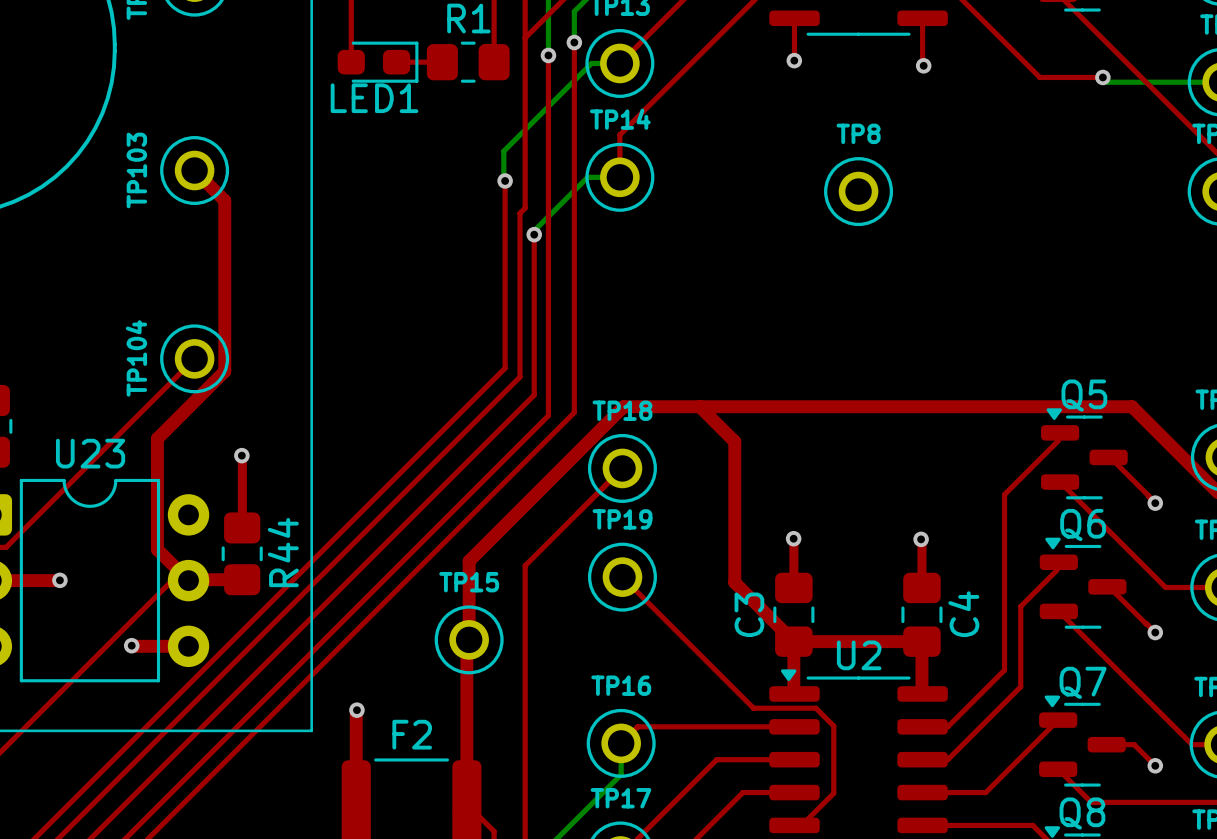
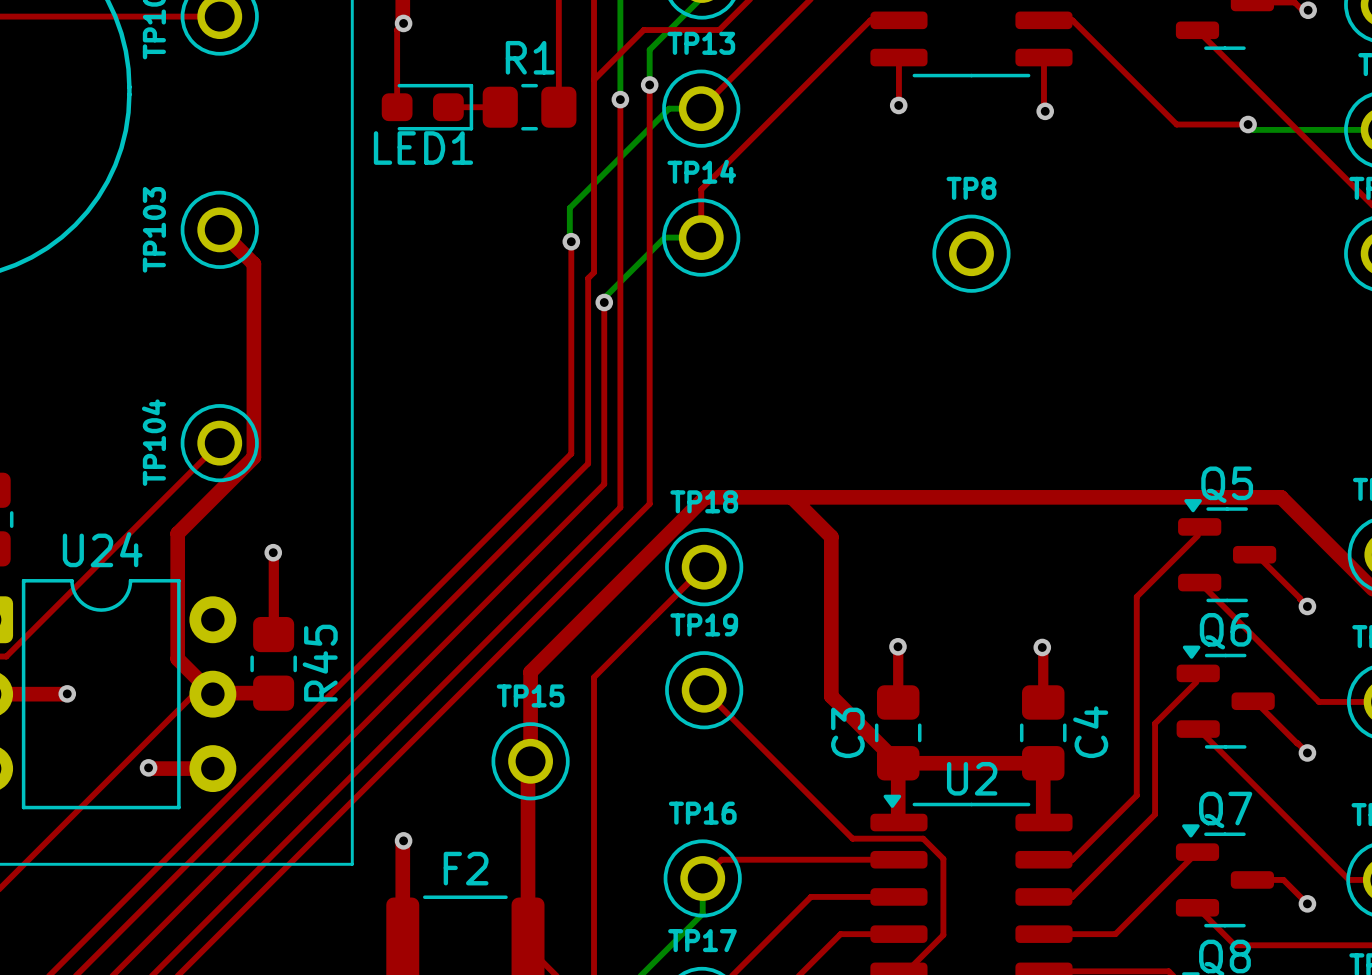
U23 name: U23 (90, 453) -> U24 (102, 549)
R44 name: R44 (283, 552) -> R45 (320, 663)

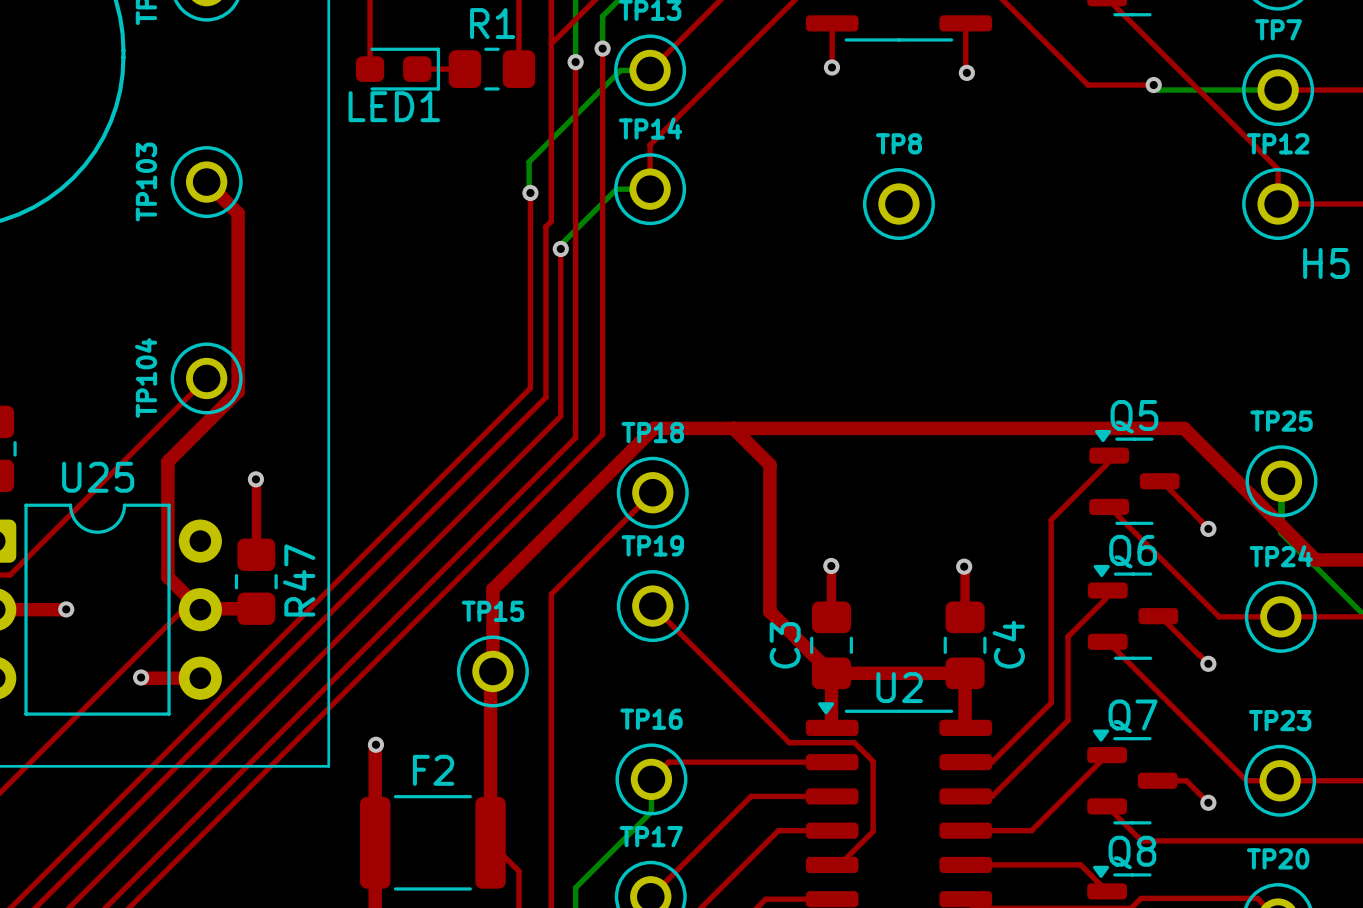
U24 name: U24 (102, 549) -> U25 (98, 477)
R45 name: R45 (320, 663) -> R47 (299, 580)

